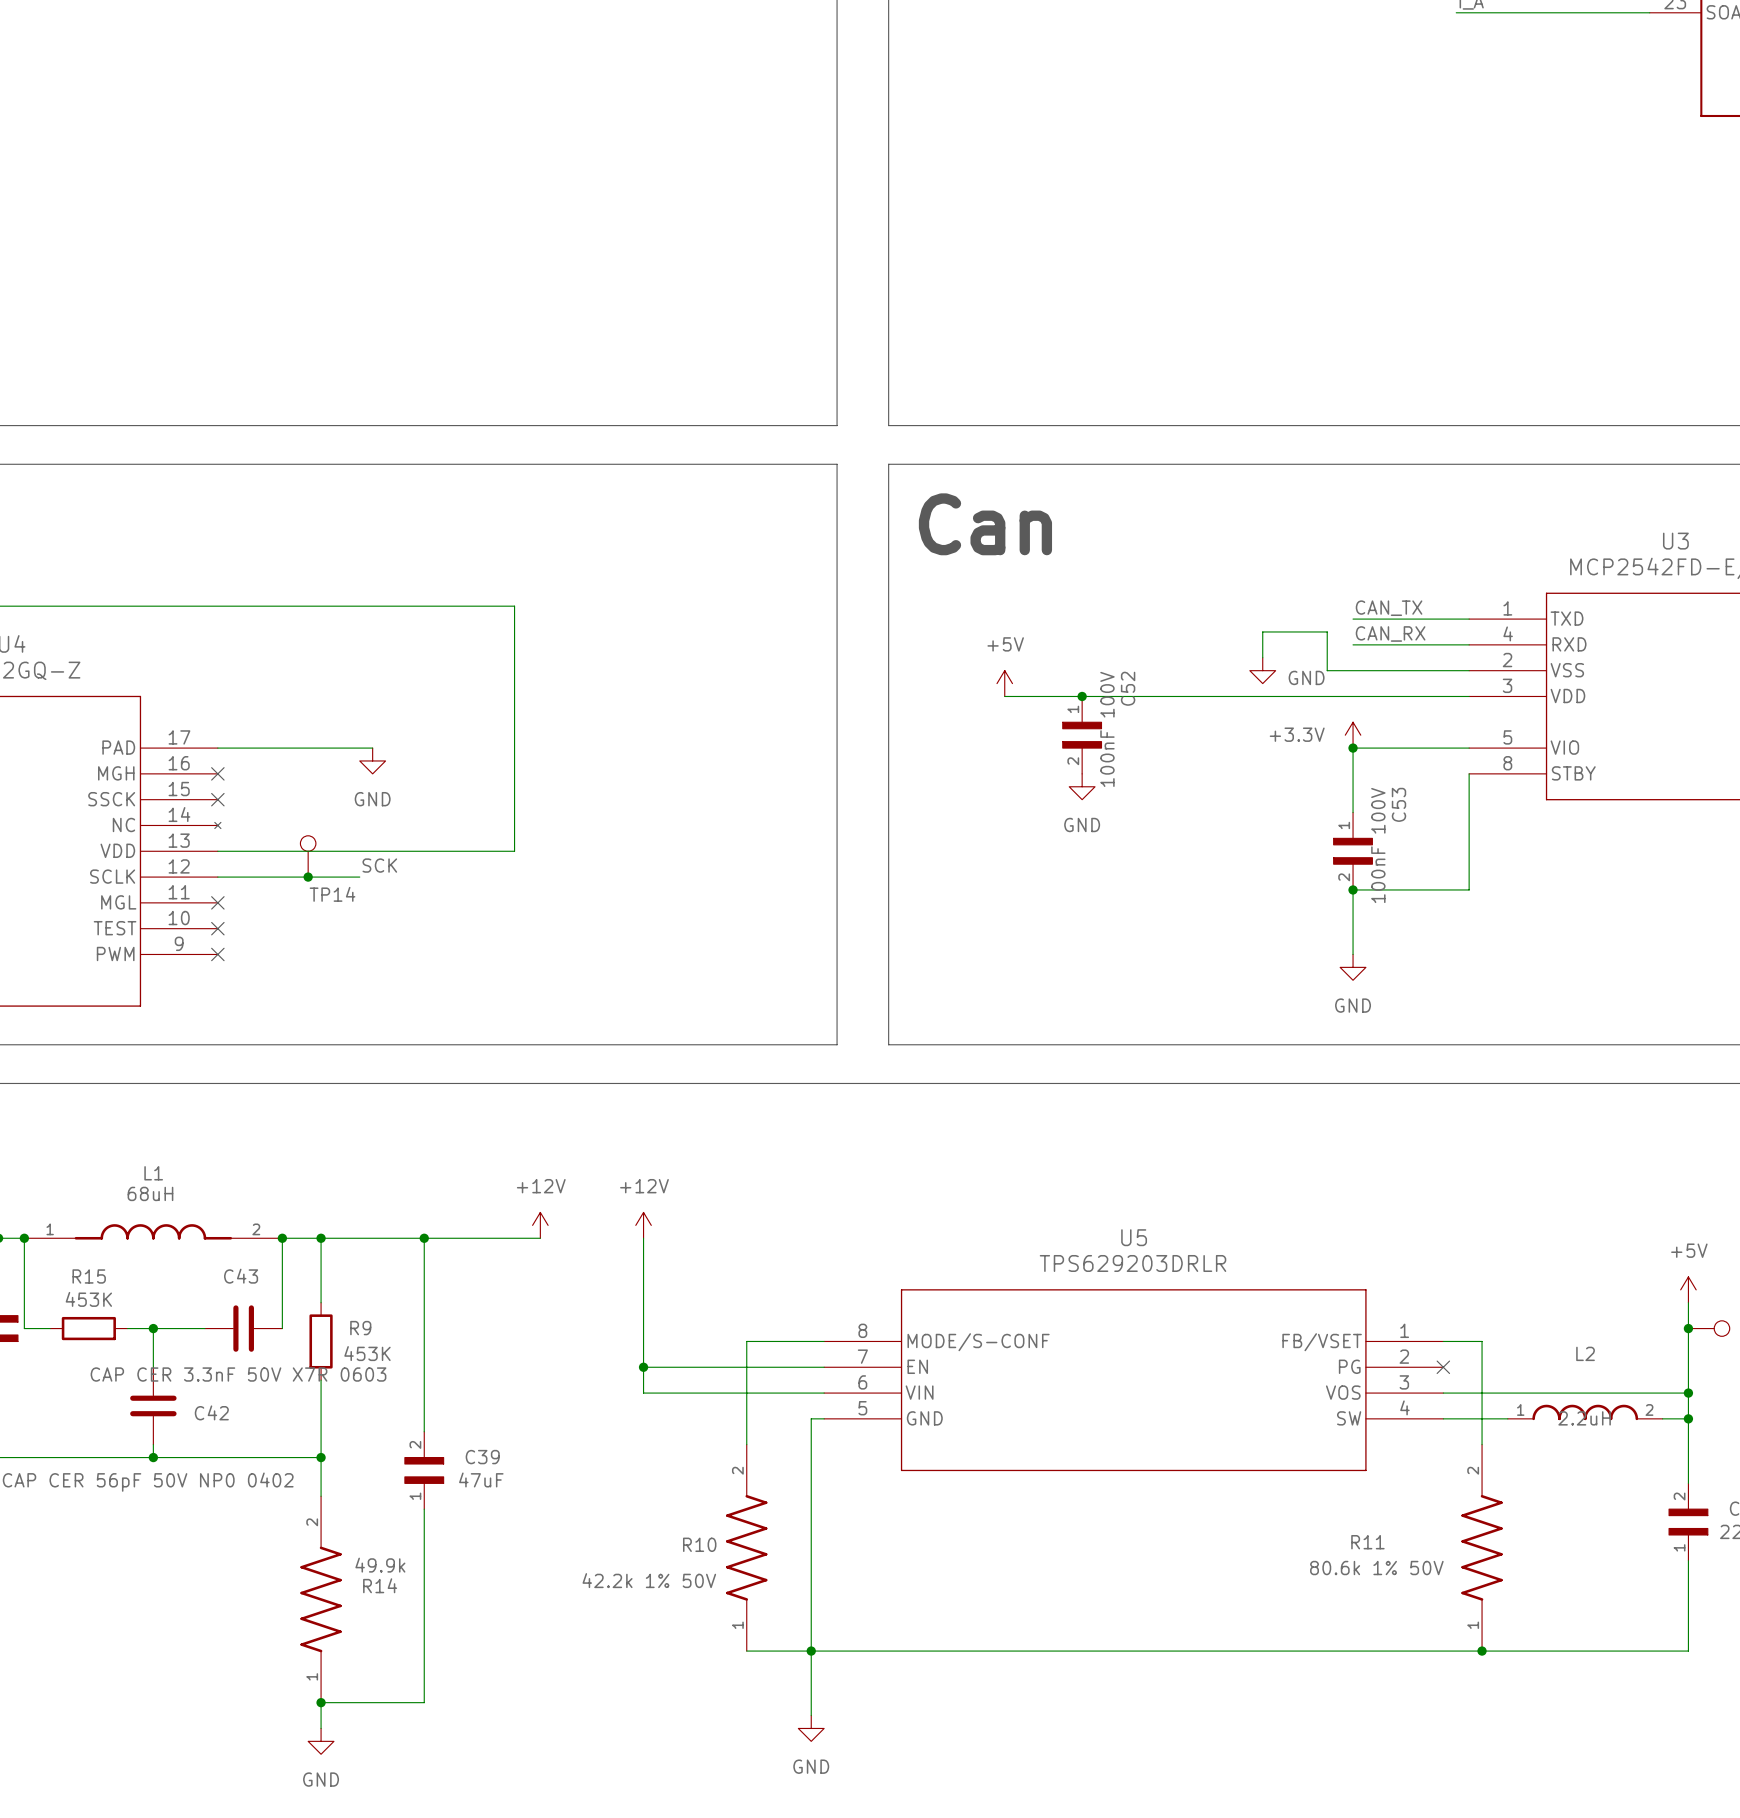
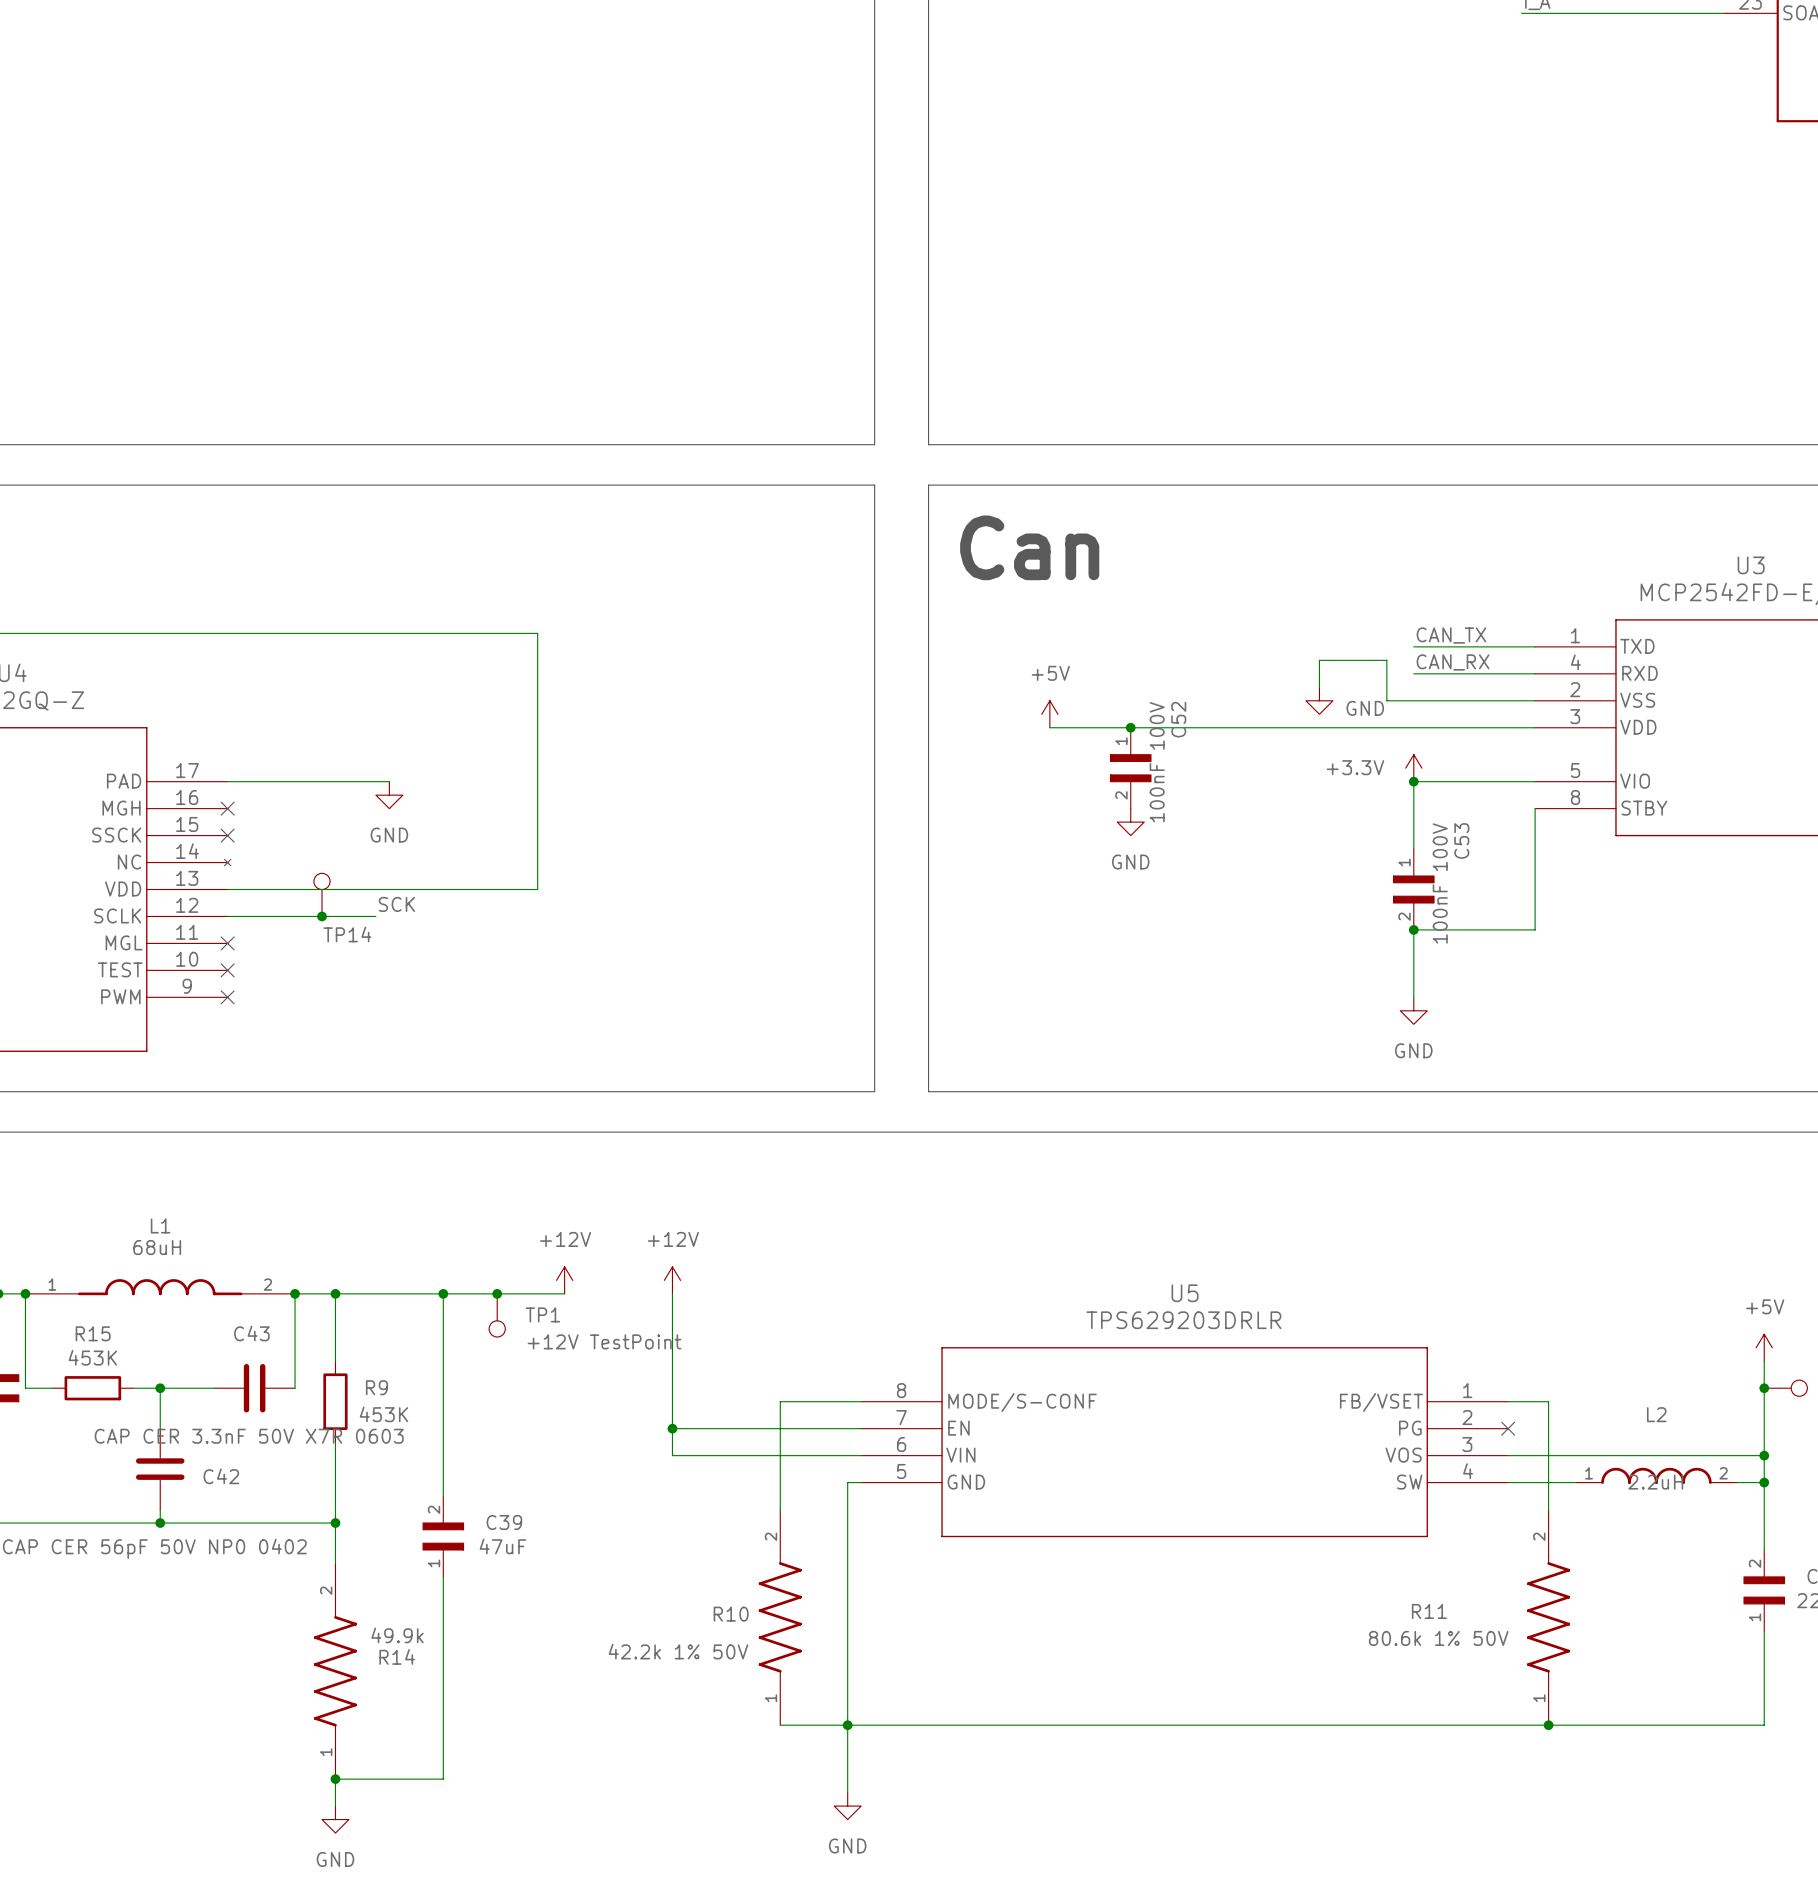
junction: none -> (497, 1293)
TP1: none -> +12V TestPoint (497, 1315)

